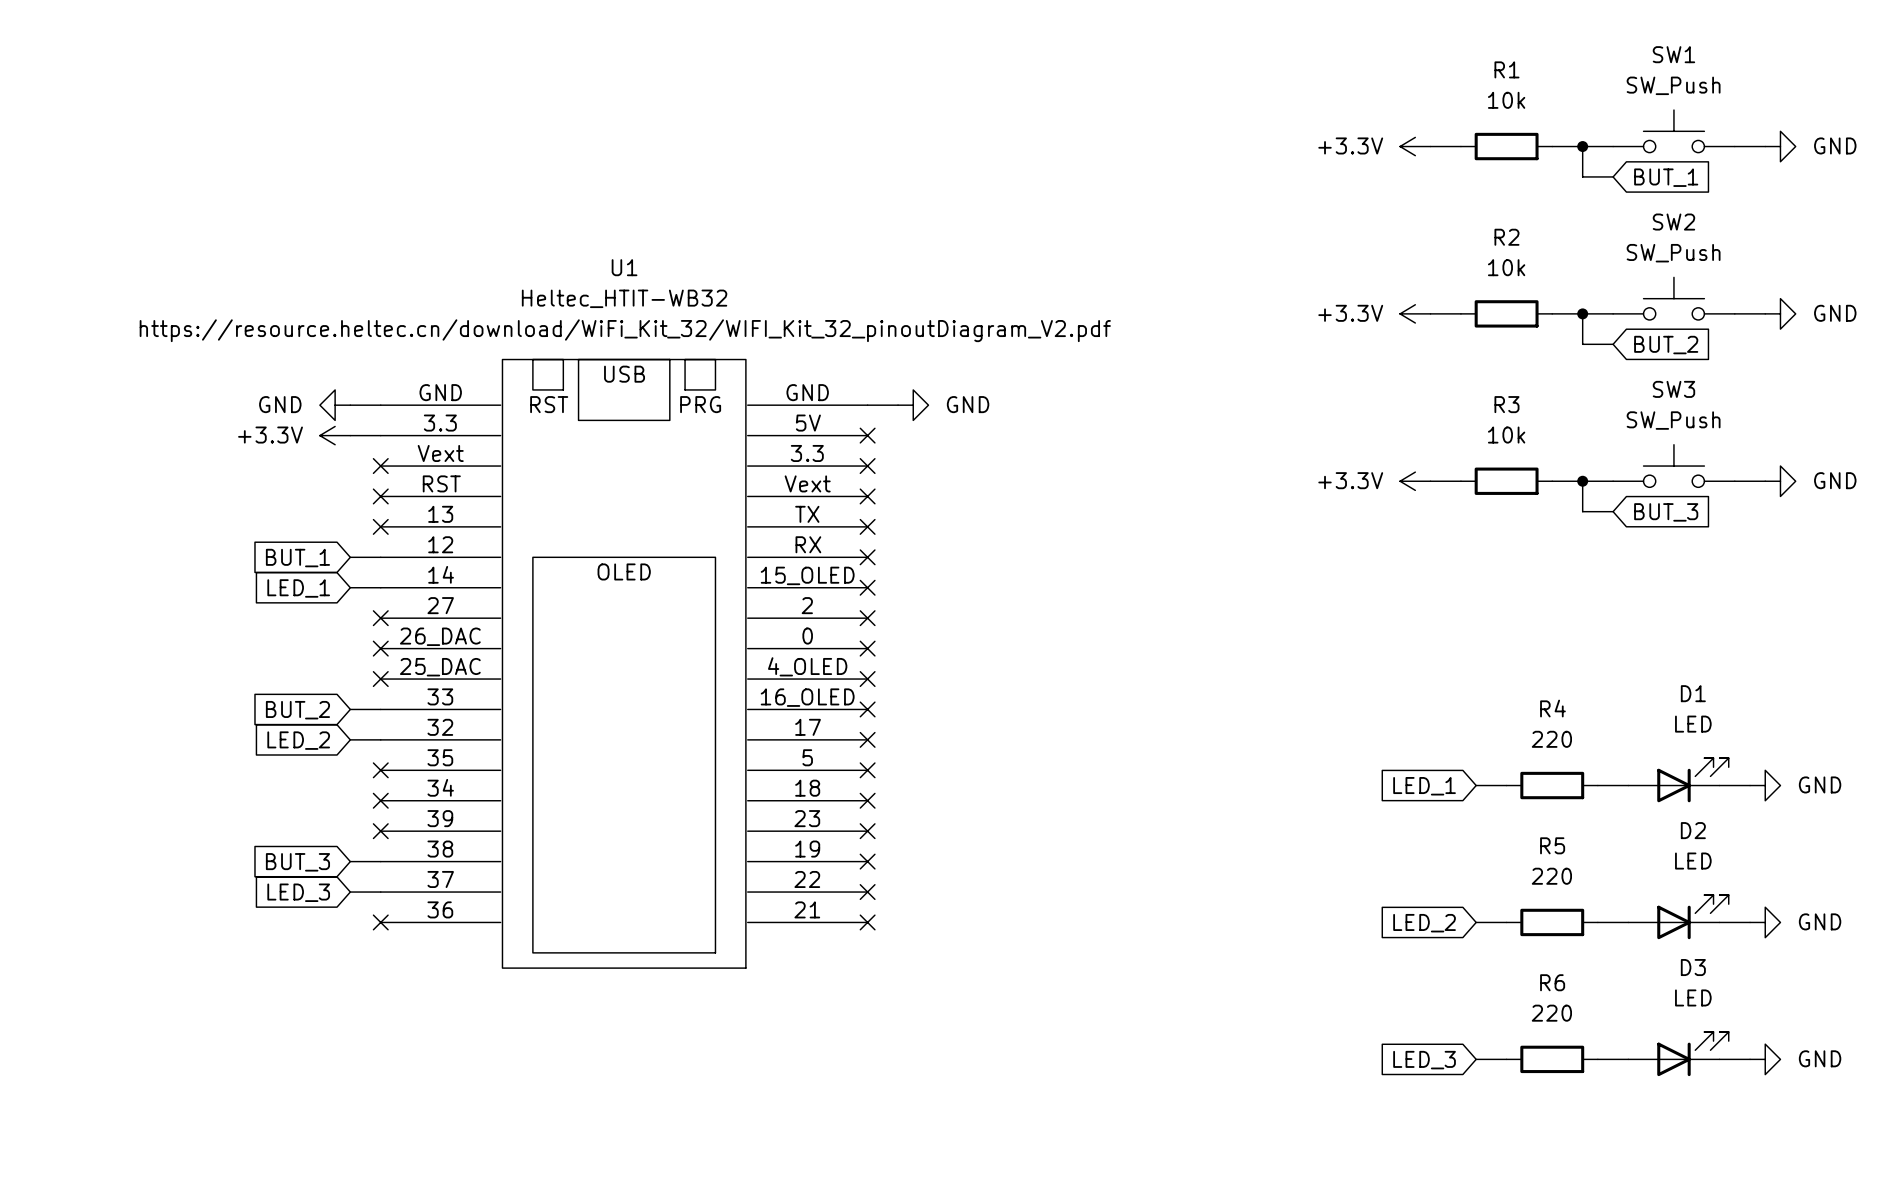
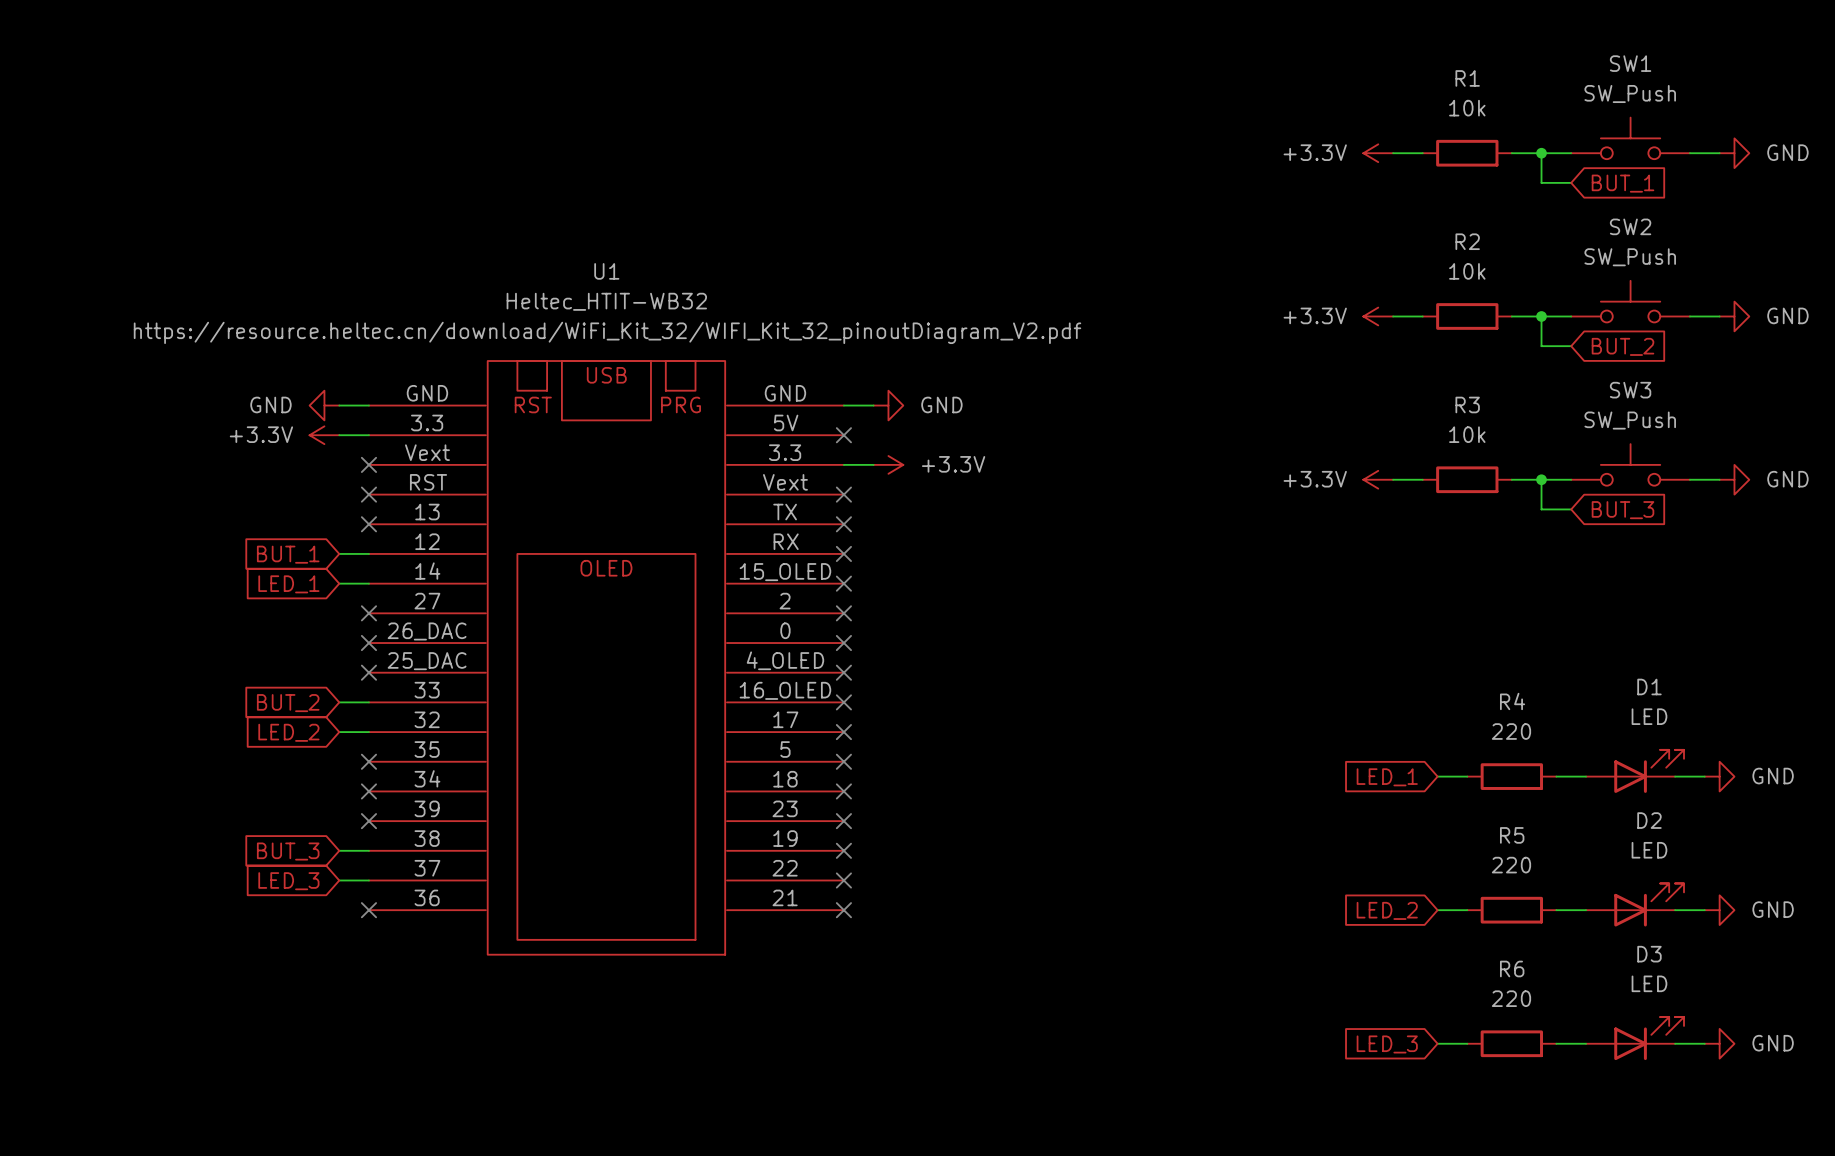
wire: none -> (843, 464) (873, 464)
no-connect mark: (867, 466) -> none
power symbol: none -> +3.3V (888, 464)

